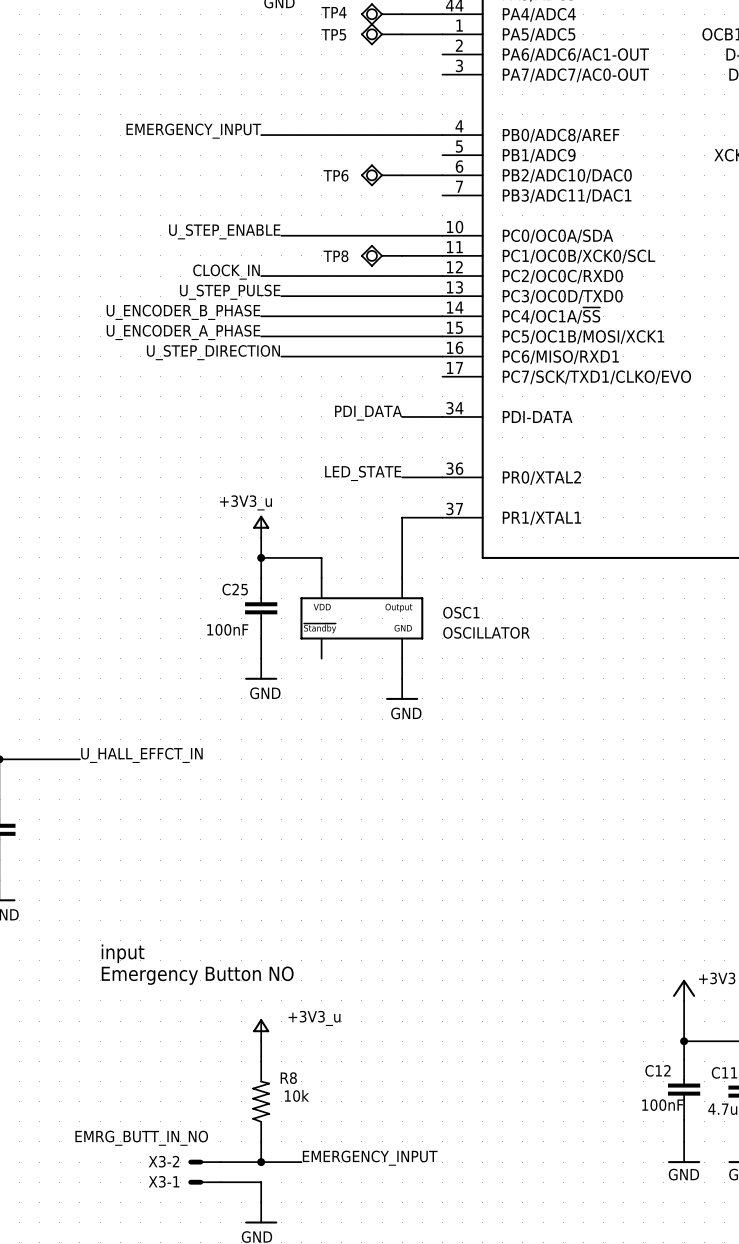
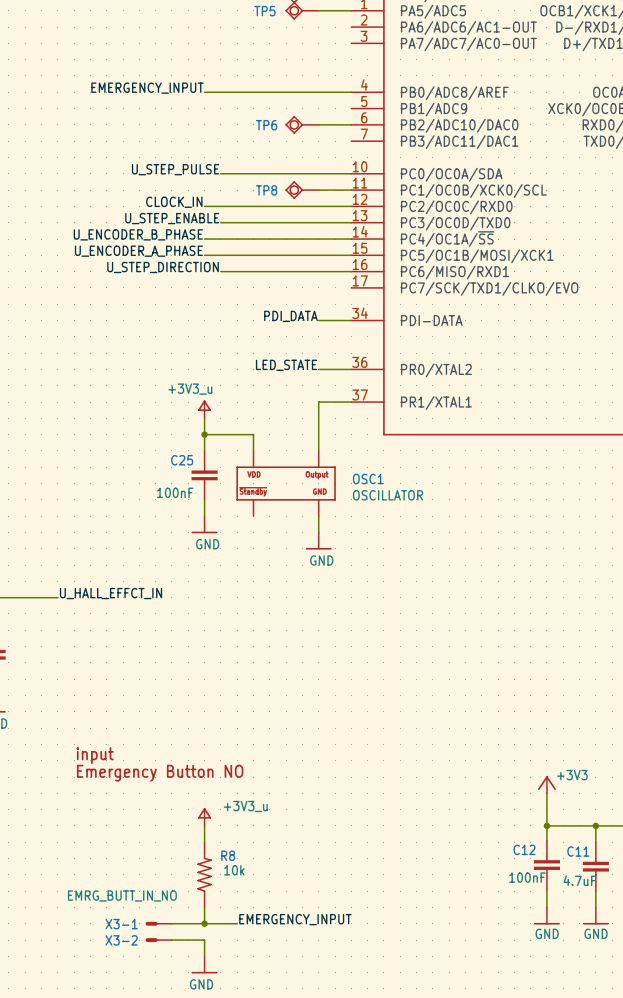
label: U_STEP_ENABLE (224, 231) -> U_STEP_PULSE (175, 169)
label: U_STEP_PULSE (230, 292) -> U_STEP_ENABLE (172, 218)
X3-2 value: none -> EMRG_BUTT_IN_NO (122, 895)
X3-1 value: EMRG_BUTT_IN_NO (141, 1138) -> none
X3-2 name: X3-2 (164, 1161) -> X3-1 (121, 924)
X3-1 name: X3-1 (164, 1181) -> X3-2 (121, 940)

